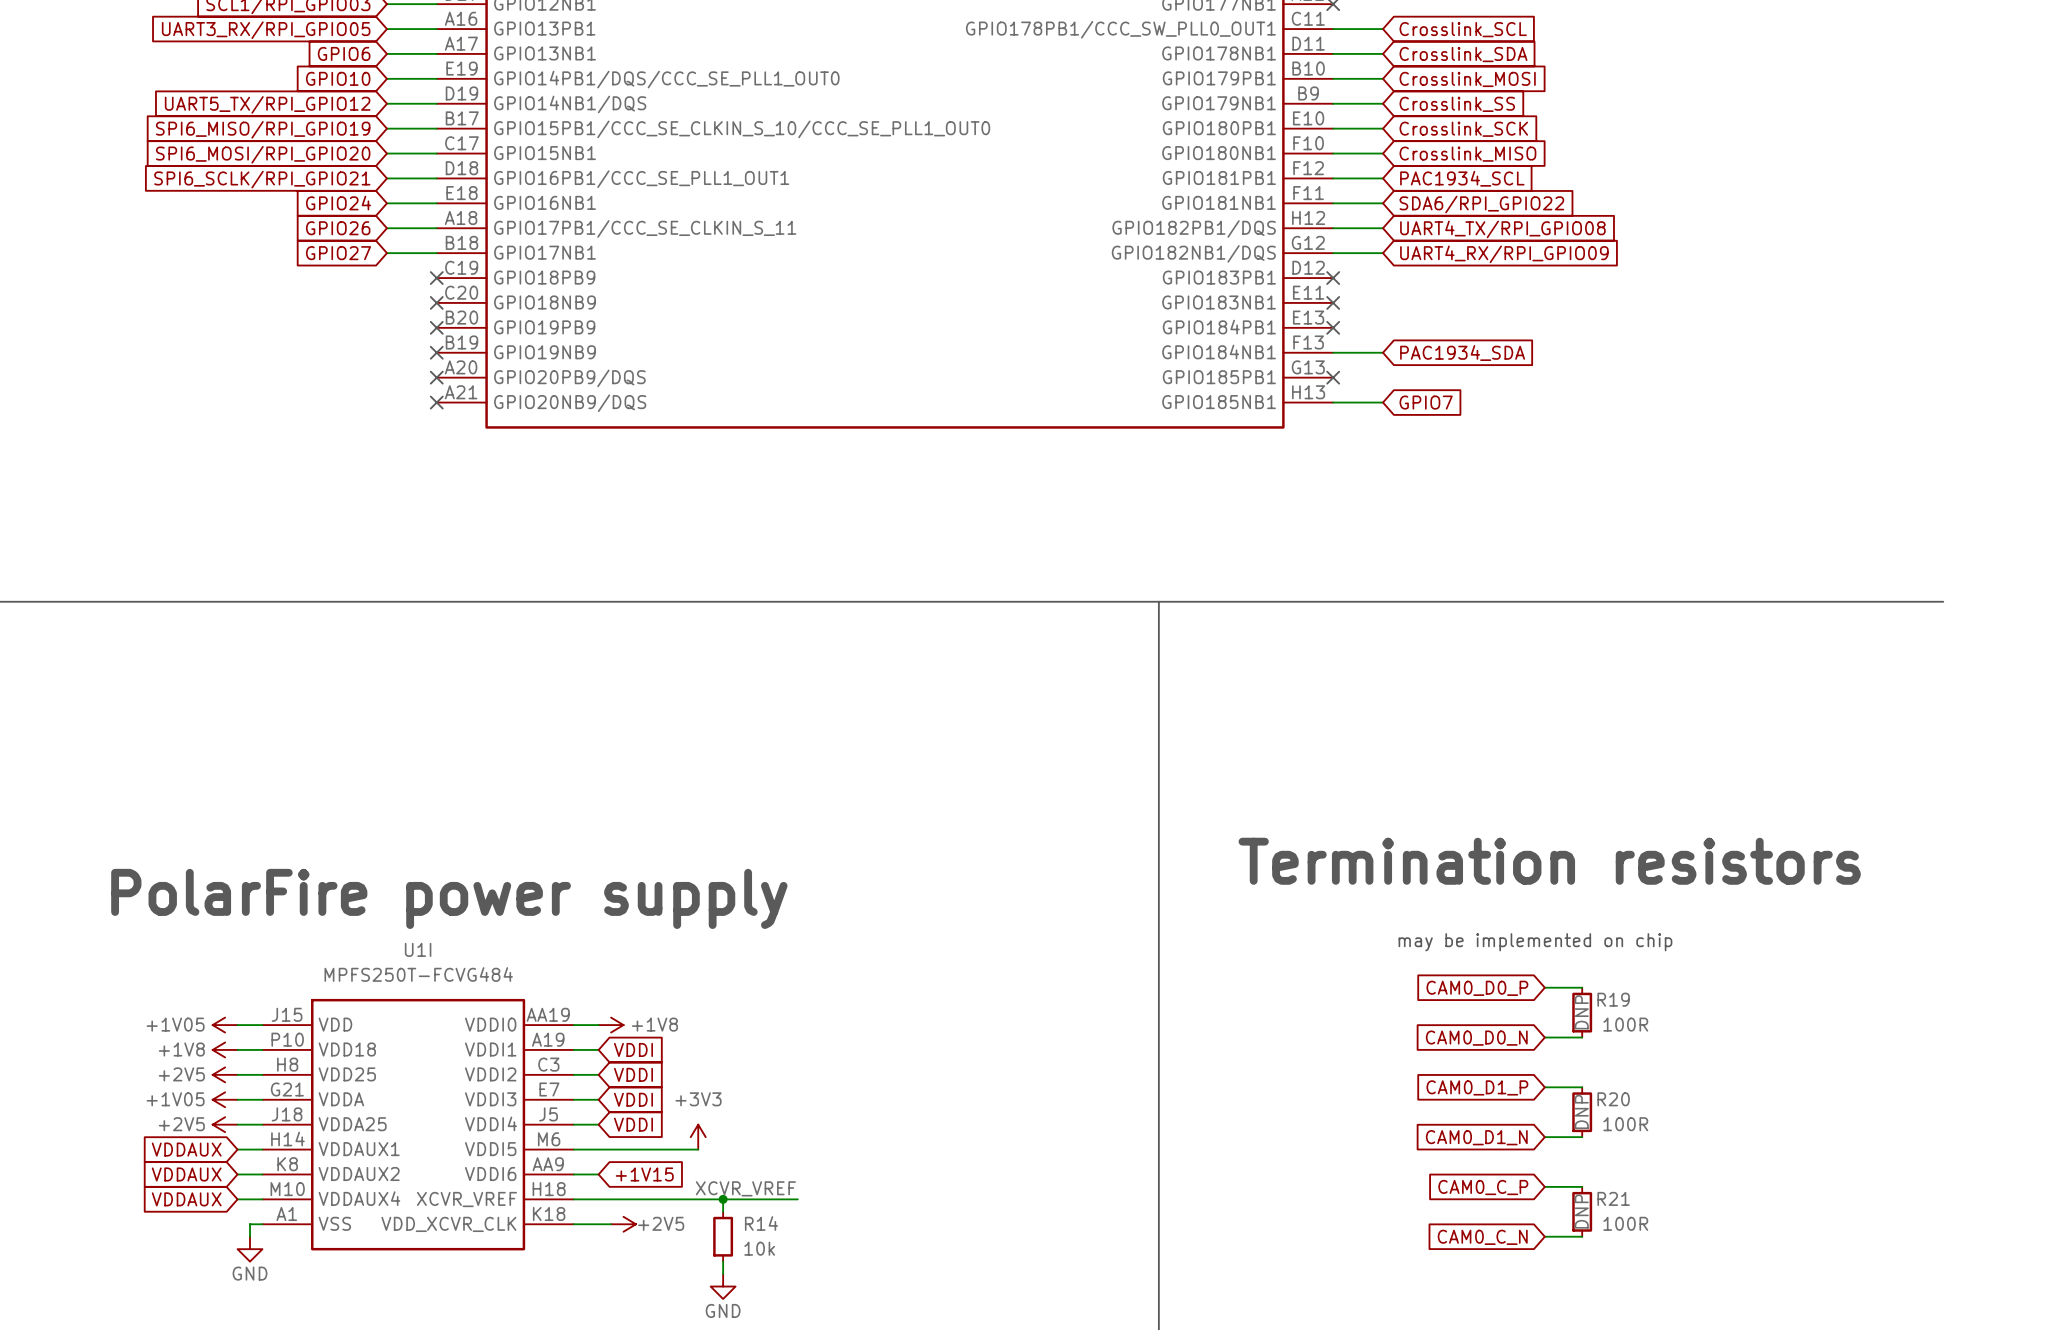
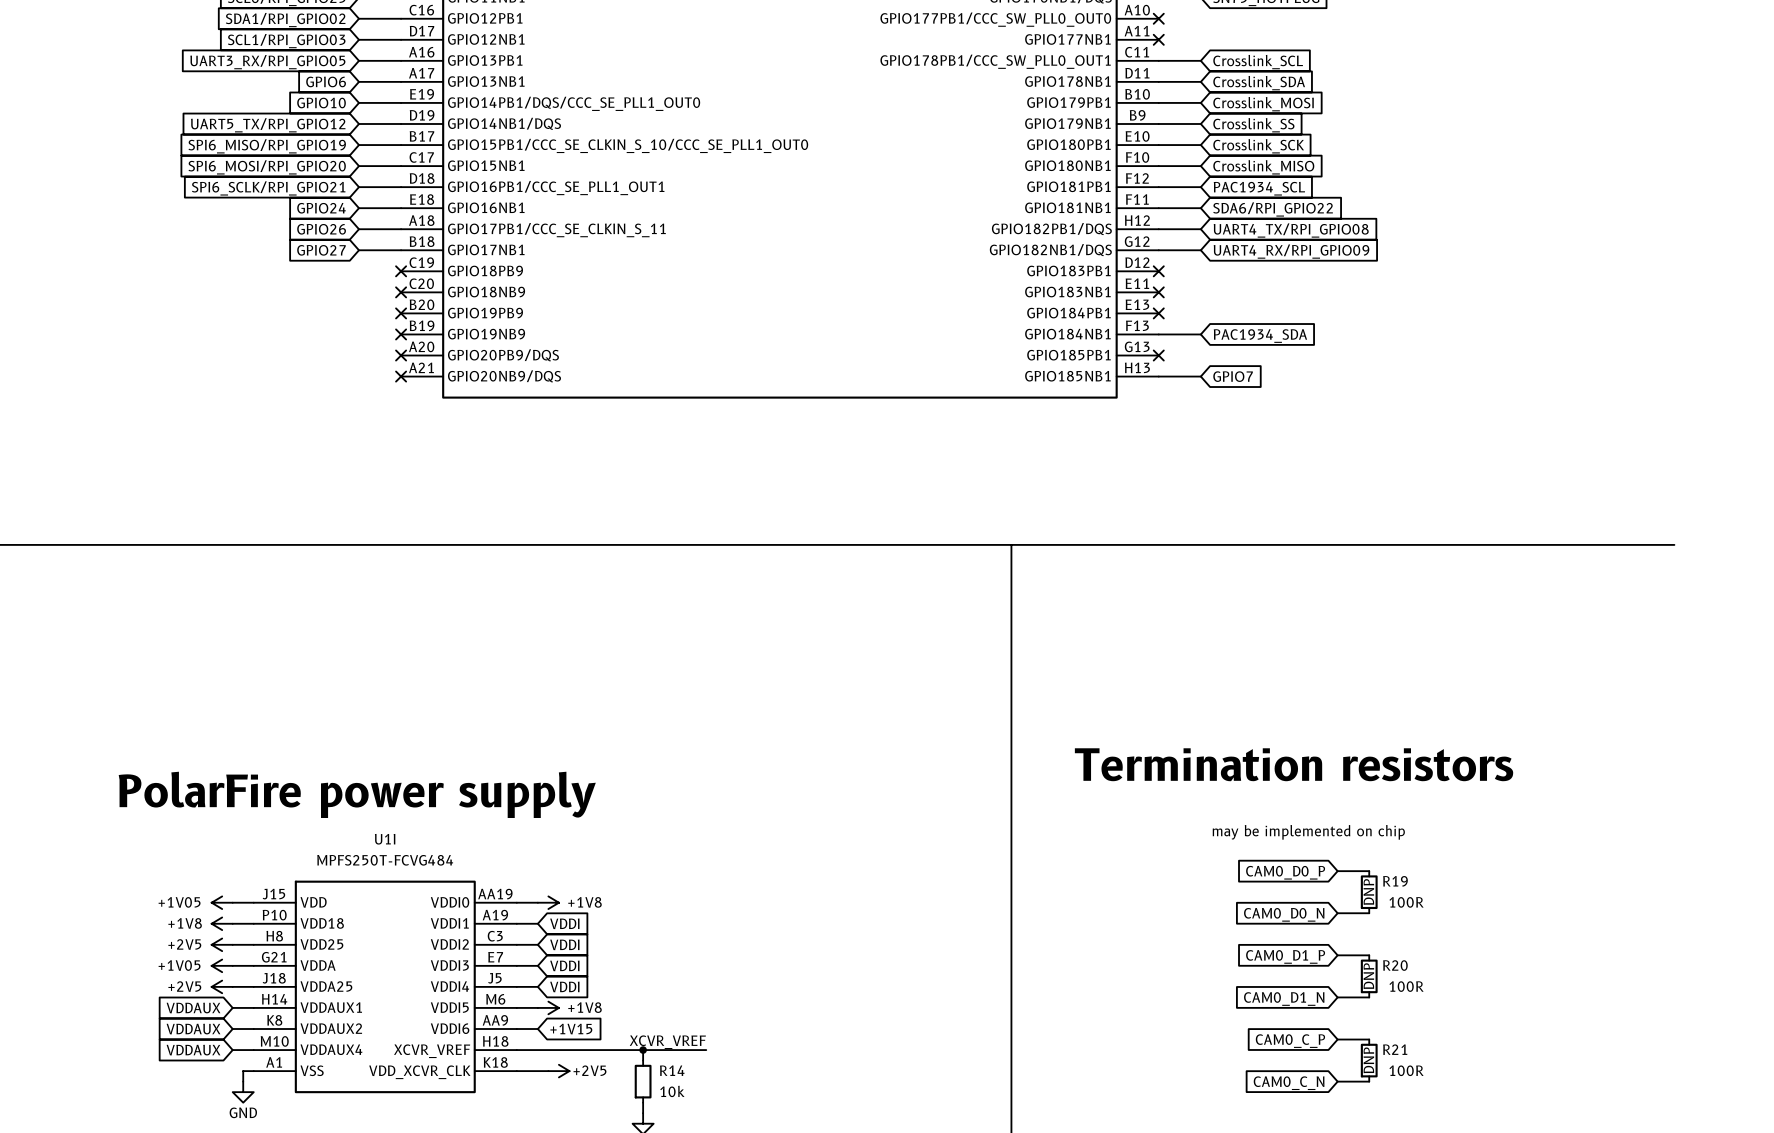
power symbol: +3V3 (698, 1137) -> none
wire: (598, 1149) (698, 1149) -> none
power symbol: none -> +1V8 (548, 1007)

